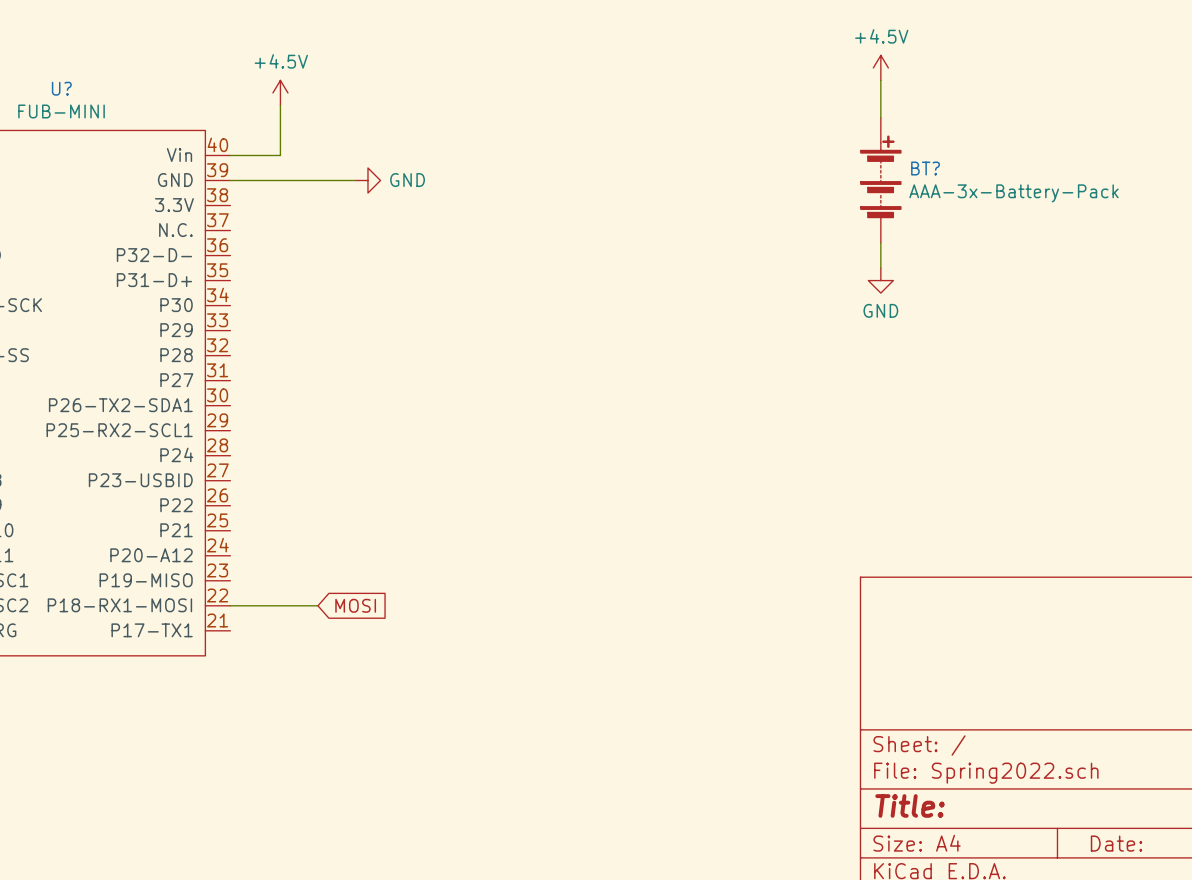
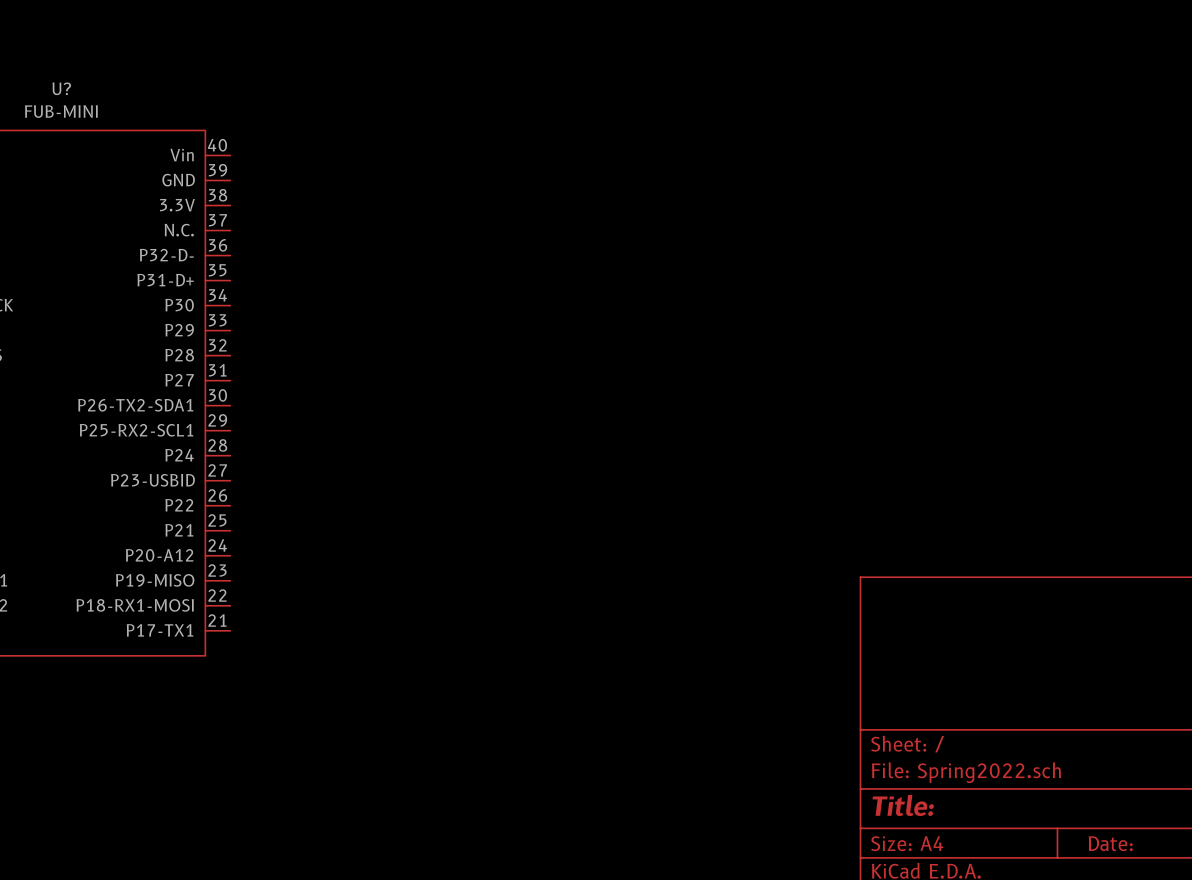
power symbol: +4.5V (880, 67) -> none
wire: (880, 80) (880, 117) -> none
power symbol: +4.5V (280, 92) -> none
wire: (280, 105) (280, 155) (230, 155) -> none
wire: (230, 180) (355, 180) -> none
power symbol: GND (367, 180) -> none
BT?: AAA-3x-Battery-Pack (880, 180) -> none
wire: (880, 243) (880, 268) -> none
power symbol: GND (880, 280) -> none
wire: (230, 605) (317, 605) -> none
global label: MOSI (355, 605) -> none

